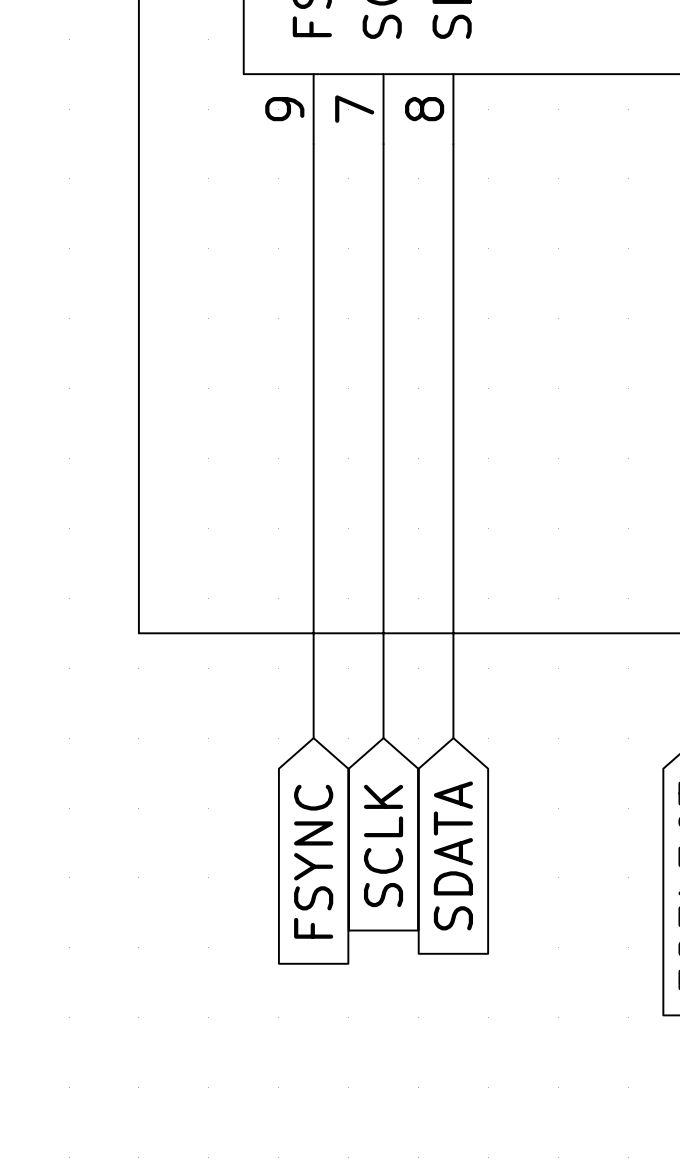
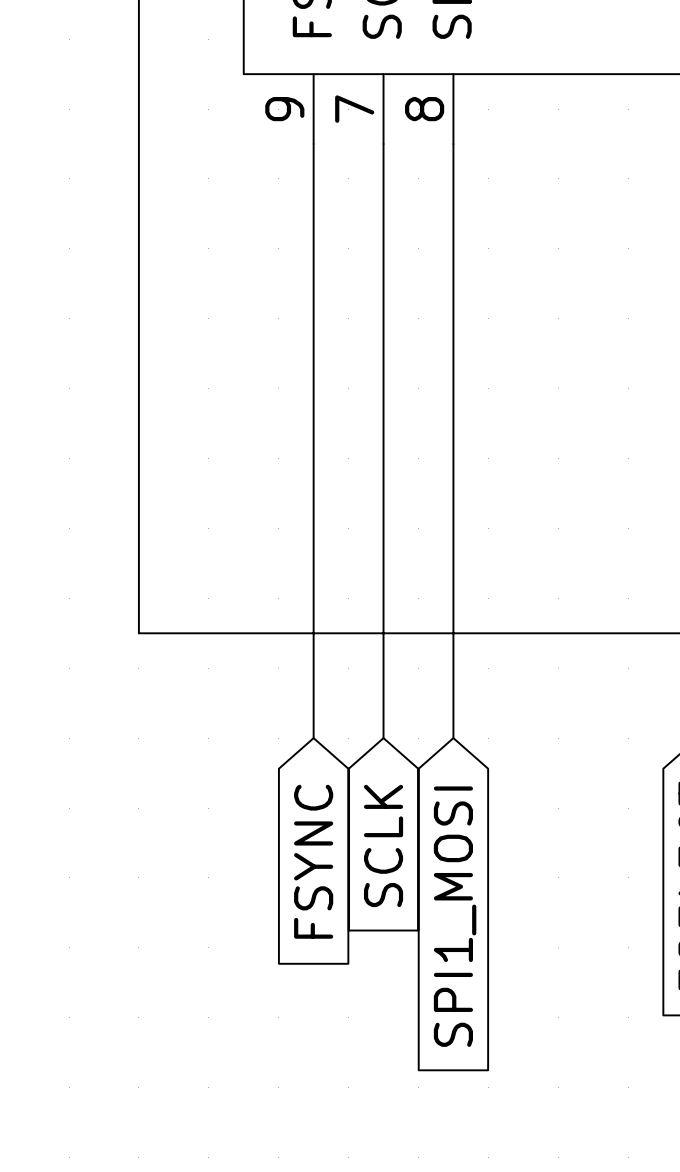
global label: SDATA (453, 855) -> SPI1_MOSI (455, 916)

